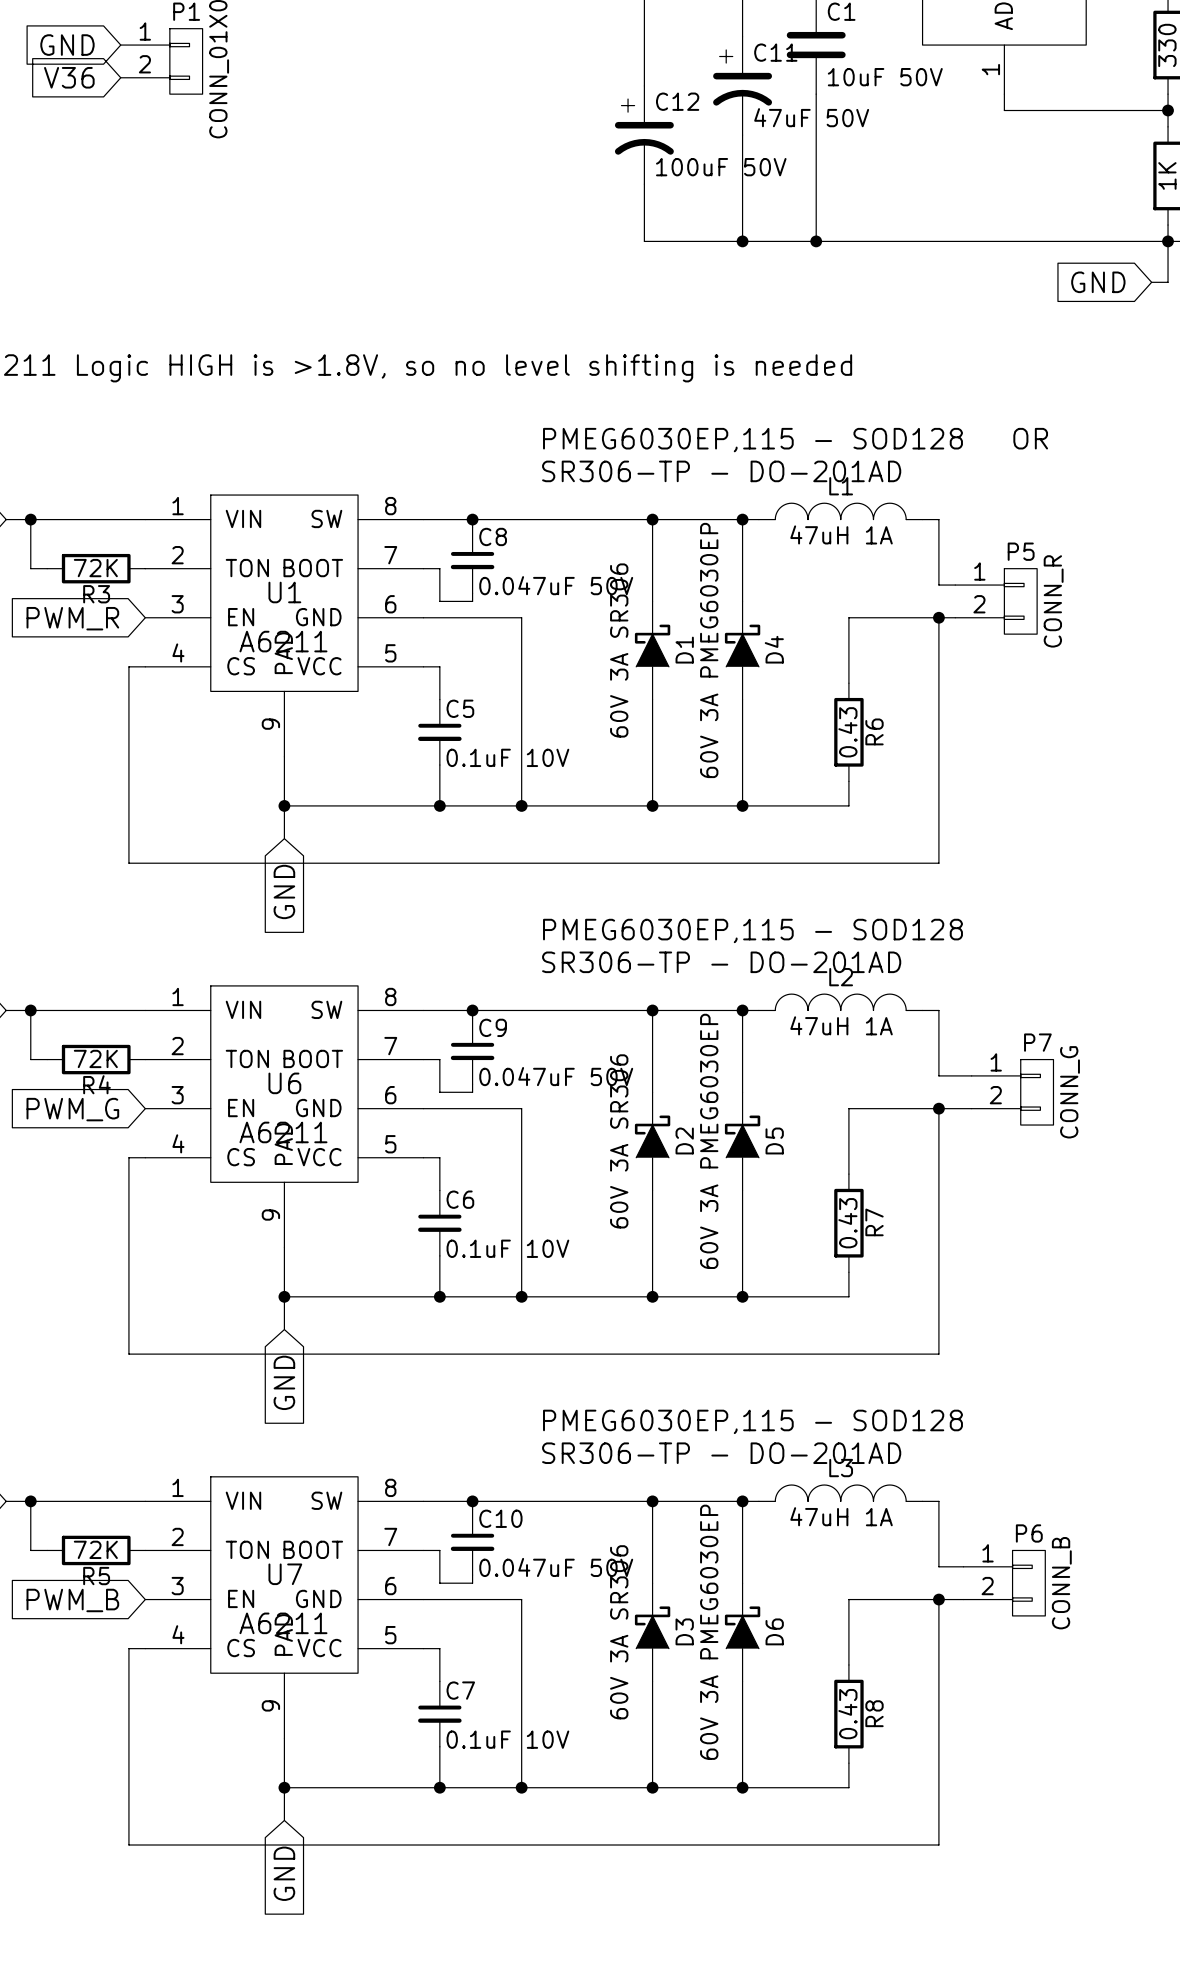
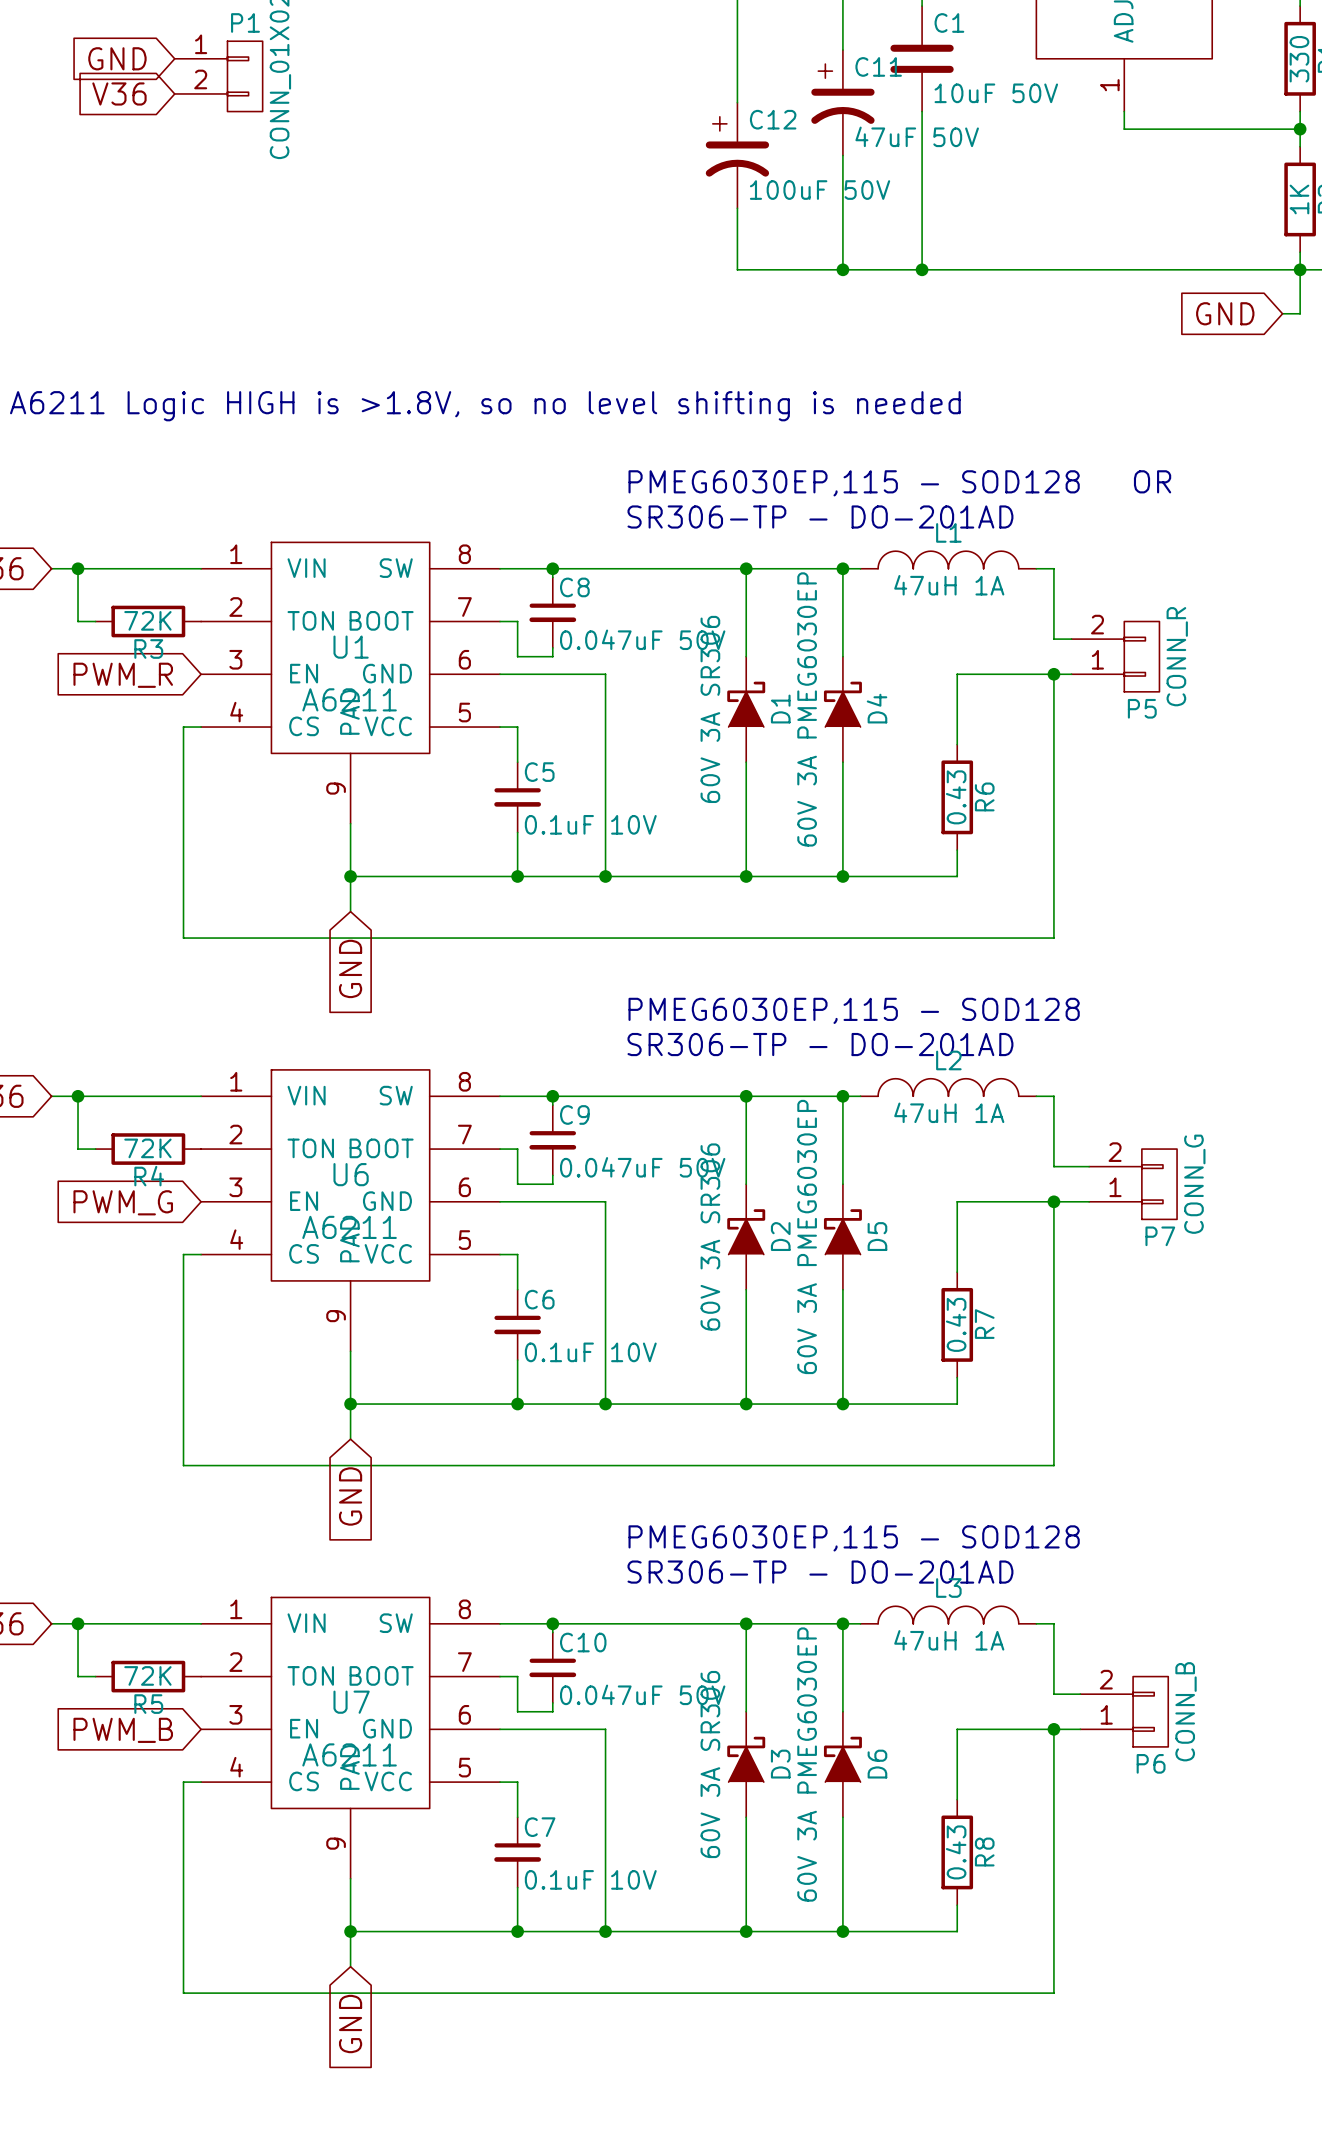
P5 flip: as is (1020, 601) -> up-down (1141, 656)
P7 flip: as is (1037, 1092) -> up-down (1159, 1184)
P6 flip: as is (1028, 1583) -> up-down (1150, 1711)

